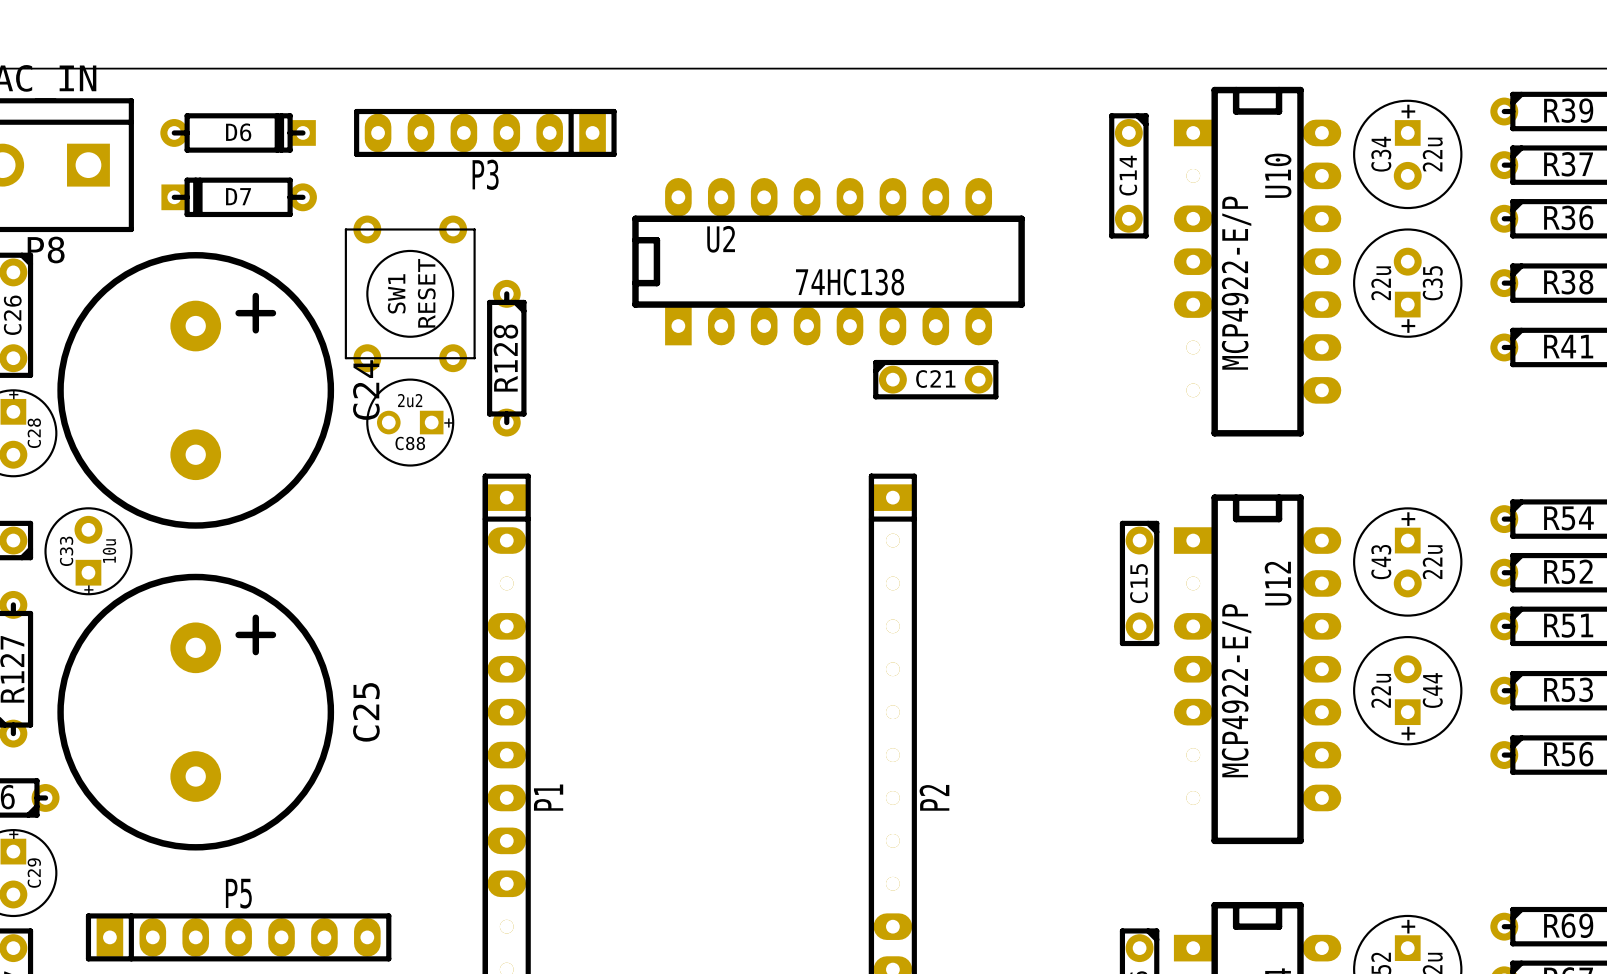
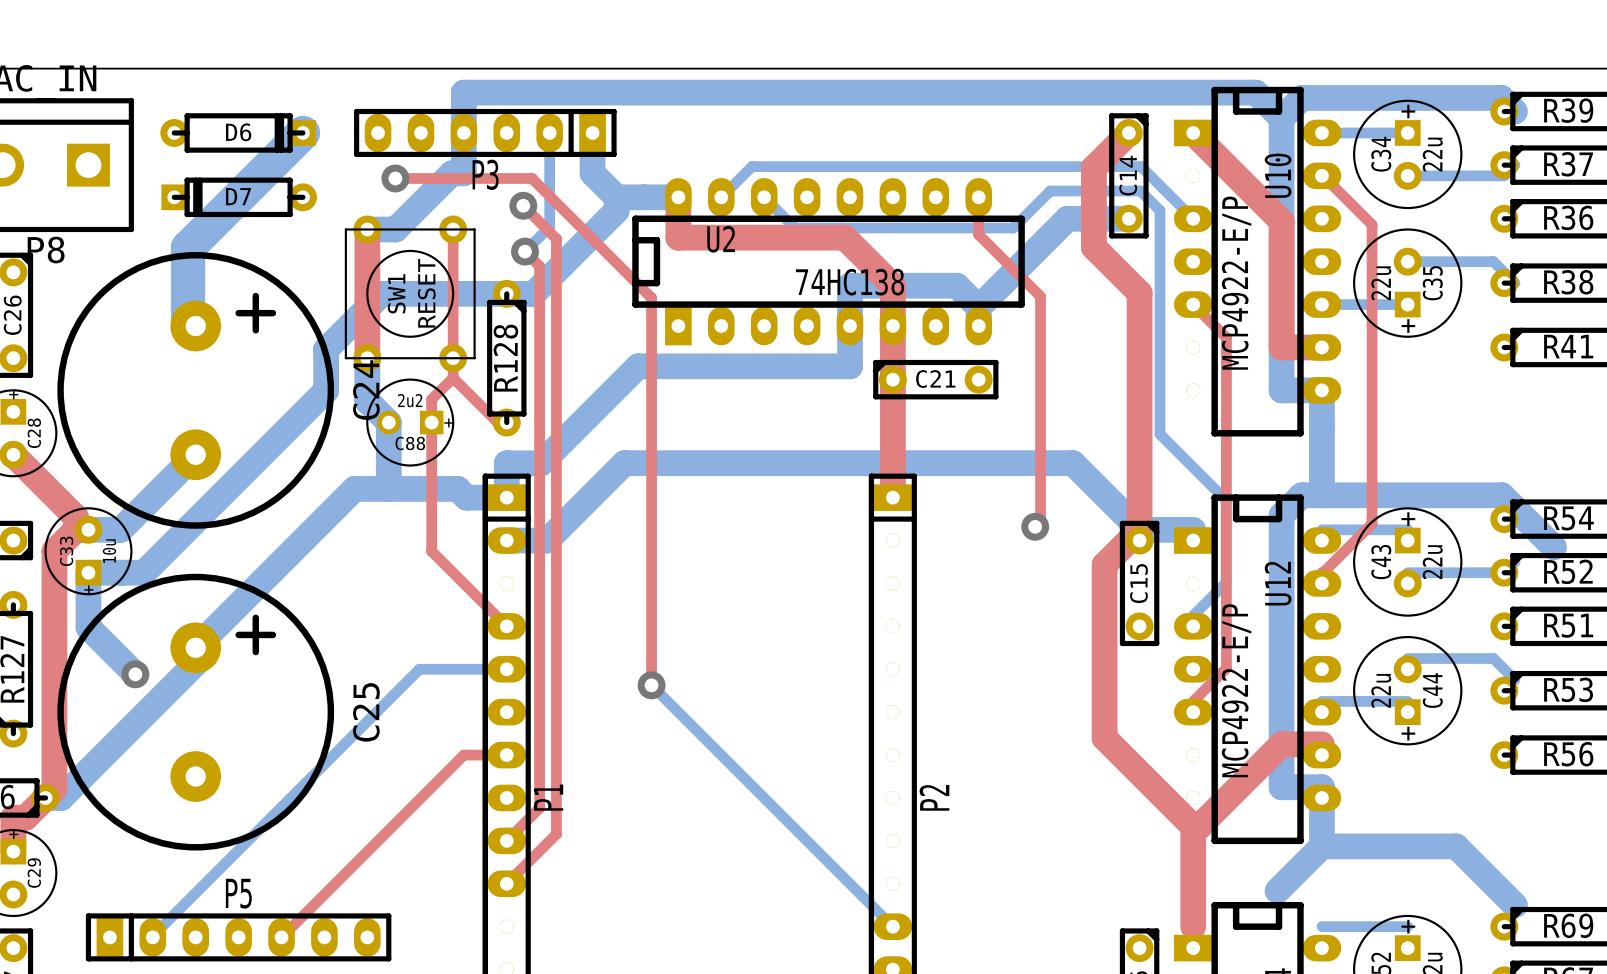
bottom track: none -> (1515, 111) (1501, 97) (1302, 97) (1281, 118)
bottom track: none -> (1281, 118) (1281, 390) (1321, 390) (1321, 495)
bottom track: none -> (1281, 118) (1255, 92) (463, 92) (463, 173) (451, 173) (395, 229) (367, 229)
bottom track: none -> (302, 132) (188, 247) (188, 318) (195, 326)
bottom track: none -> (549, 132) (549, 226) (524, 251)
bottom track: none -> (592, 132) (592, 173) (616, 197)
top track: none -> (1128, 132) (1093, 167) (1093, 247) (1139, 292) (1139, 529) (1104, 564) (1104, 738) (1193, 826)
top track: none -> (1193, 132) (1281, 221) (1281, 347) (1321, 347)
bottom track: none -> (1321, 132) (1407, 132)
bottom track: none -> (1515, 165) (1504, 175) (1407, 175)
top track: none -> (1321, 175) (1372, 224) (1372, 523) (1321, 572)
top track: none -> (395, 178) (532, 178) (651, 297) (651, 685)
via: none -> (395, 178)
bottom track: none -> (616, 197) (678, 197)
bottom track: none -> (616, 197) (616, 210) (533, 293) (381, 293) (326, 349) (326, 390) (143, 572) (88, 572) (88, 627) (135, 674)
top track: none -> (678, 197) (678, 237) (844, 237) (892, 285) (892, 497)
bottom track: none -> (721, 197) (751, 166) (1141, 166) (1193, 218)
bottom track: none -> (764, 197) (794, 228) (1013, 228) (1050, 191) (1140, 191) (1160, 210) (1160, 434) (1226, 500) (1226, 582) (1193, 615)
top track: none -> (978, 197) (978, 234) (1040, 296) (1040, 521) (1035, 526)
top track: none -> (523, 205) (556, 238) (556, 834) (506, 883)
via: none -> (523, 205)
bottom track: none -> (1128, 218) (1067, 218) (978, 307)
top track: none -> (367, 229) (367, 358)
top track: none -> (453, 229) (453, 377)
top track: none -> (524, 251) (539, 266) (539, 808) (506, 840)
via: none -> (524, 251)
bottom track: none -> (1407, 261) (1493, 261) (1515, 283)
top track: none -> (1193, 304) (1226, 337) (1226, 668) (1193, 701)
bottom track: none -> (1321, 304) (1407, 304)
bottom track: none -> (978, 307) (956, 285) (850, 285) (850, 366) (638, 366) (541, 463) (506, 463) (506, 497) (466, 497) (457, 488) (354, 488) (195, 647) (195, 663) (61, 797) (45, 797)
bottom track: none -> (367, 358) (367, 401) (388, 422) (388, 488)
top track: none -> (453, 377) (431, 399) (431, 551) (506, 626)
top track: none -> (453, 377) (497, 422) (506, 422)
top track: none -> (13, 454) (75, 517) (75, 529)
bottom track: none -> (195, 454) (120, 529) (88, 529)
via: none -> (1035, 526)
top track: none -> (75, 529) (54, 551) (54, 789) (25, 817) (13, 817) (13, 851)
bottom track: none -> (1193, 529) (1139, 529) (1072, 463) (624, 463) (547, 540) (506, 540)
bottom track: none -> (1321, 529) (1407, 529)
bottom track: none -> (1554, 547) (1501, 495) (1301, 495) (1281, 515) (1281, 787) (1321, 787) (1321, 846)
bottom track: none -> (1515, 561) (1504, 572) (1407, 572)
bottom track: none -> (1407, 658) (1493, 658) (1515, 679)
bottom track: none -> (506, 669) (419, 669) (152, 937)
via: none -> (135, 674)
bottom track: none -> (651, 685) (892, 926)
via: none -> (651, 685)
bottom track: none -> (1321, 701) (1407, 701)
top track: none -> (1321, 744) (1281, 744) (1199, 826) (1193, 826)
top track: none -> (506, 755) (463, 755) (281, 937)
top track: none -> (1193, 826) (1193, 926)
bottom track: none -> (1321, 846) (1456, 846) (1515, 905)
bottom track: none -> (1321, 846) (1277, 890)
bottom track: none -> (1321, 926) (1407, 926)

